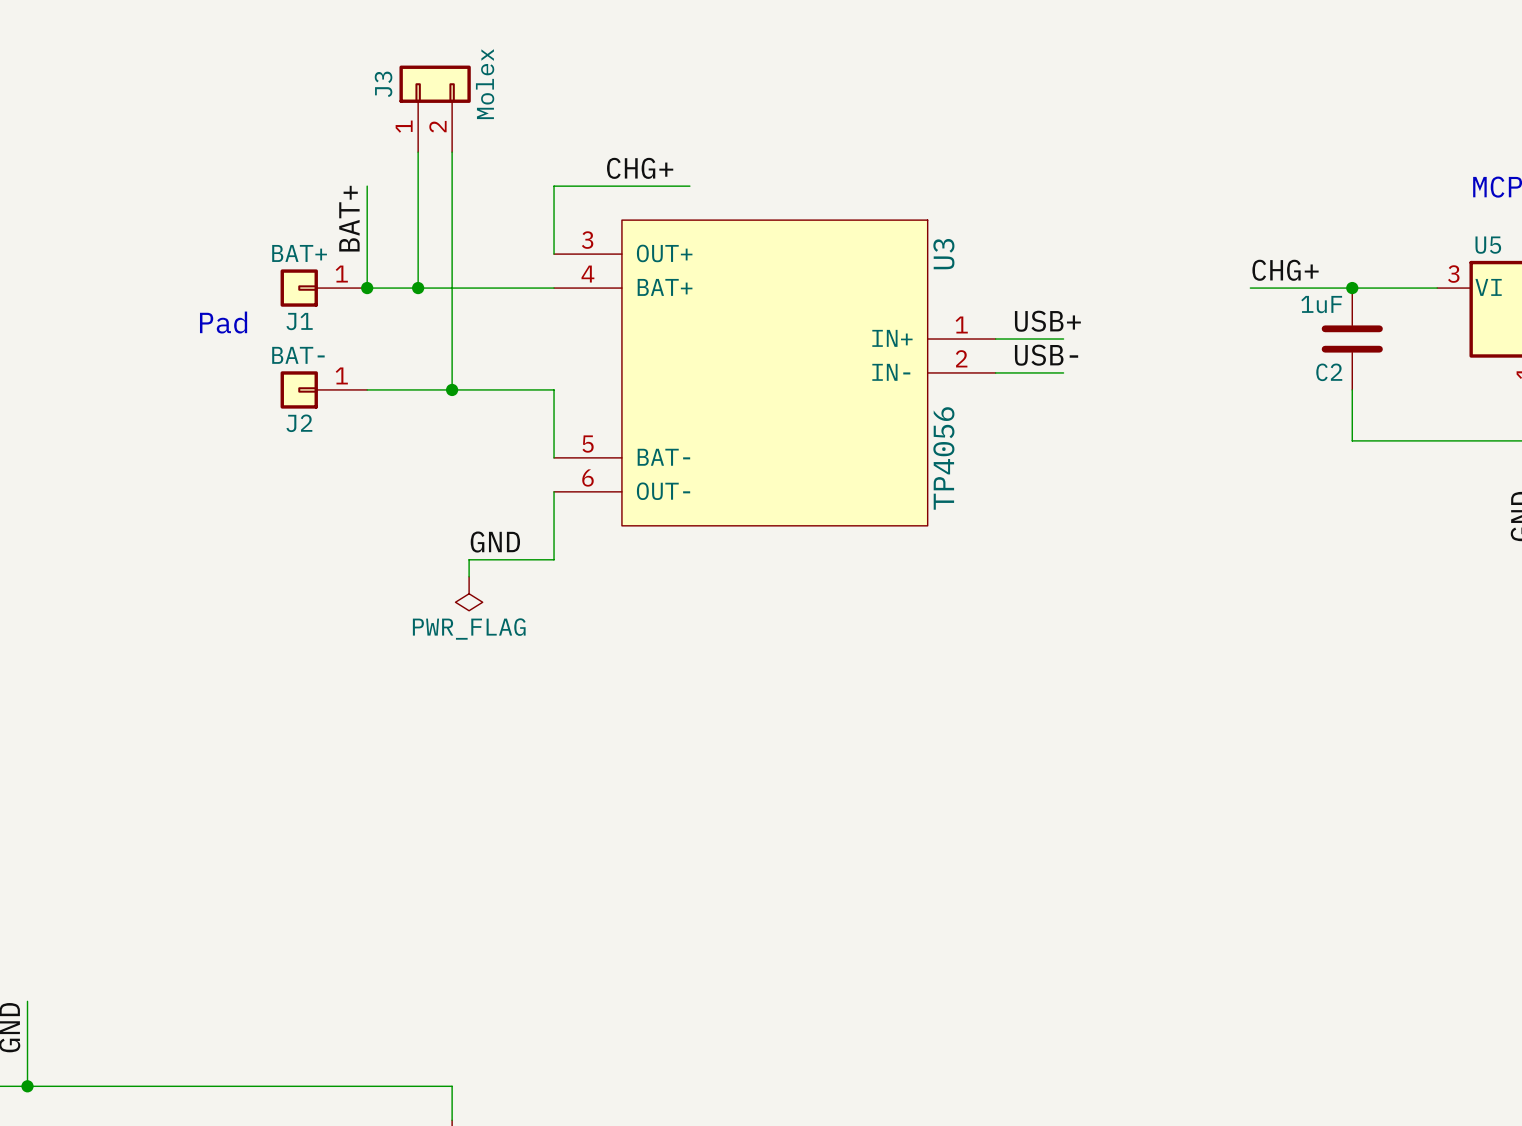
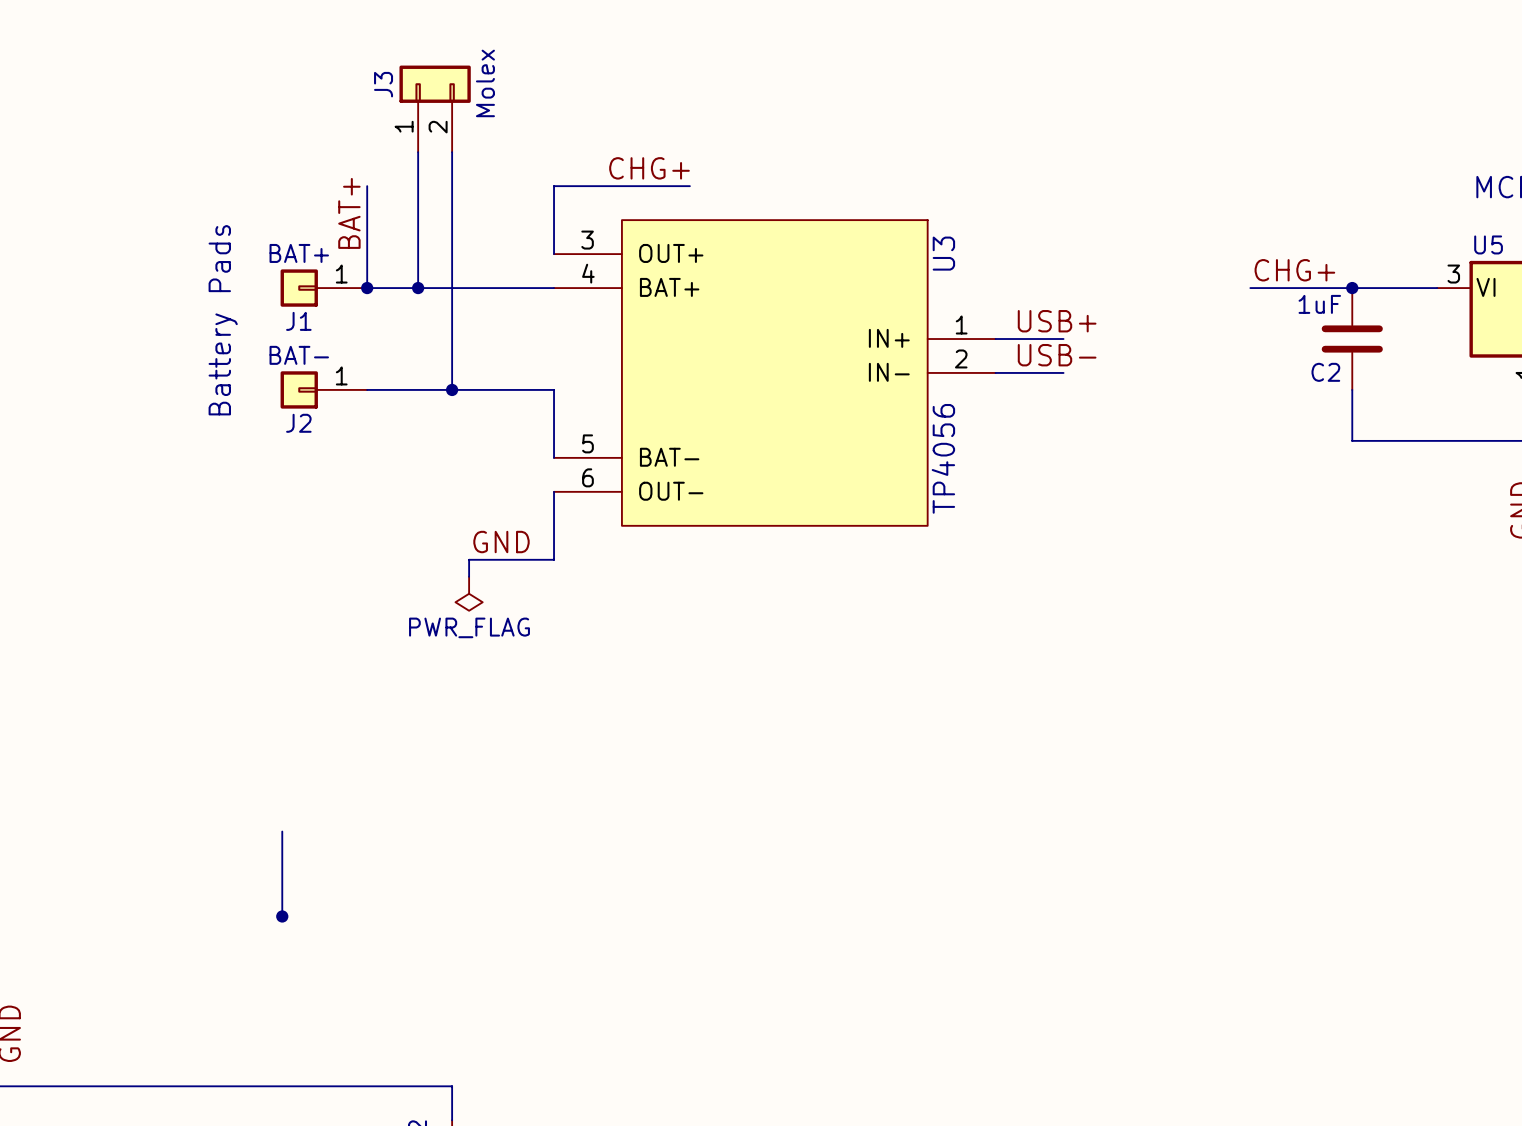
text: none -> Battery Pads (223, 320)
text: Pad (223, 322) -> none
junction: none -> (282, 916)
wire: (27, 1001) (27, 1086) -> (282, 831) (282, 916)
junction: (27, 1086) -> none

